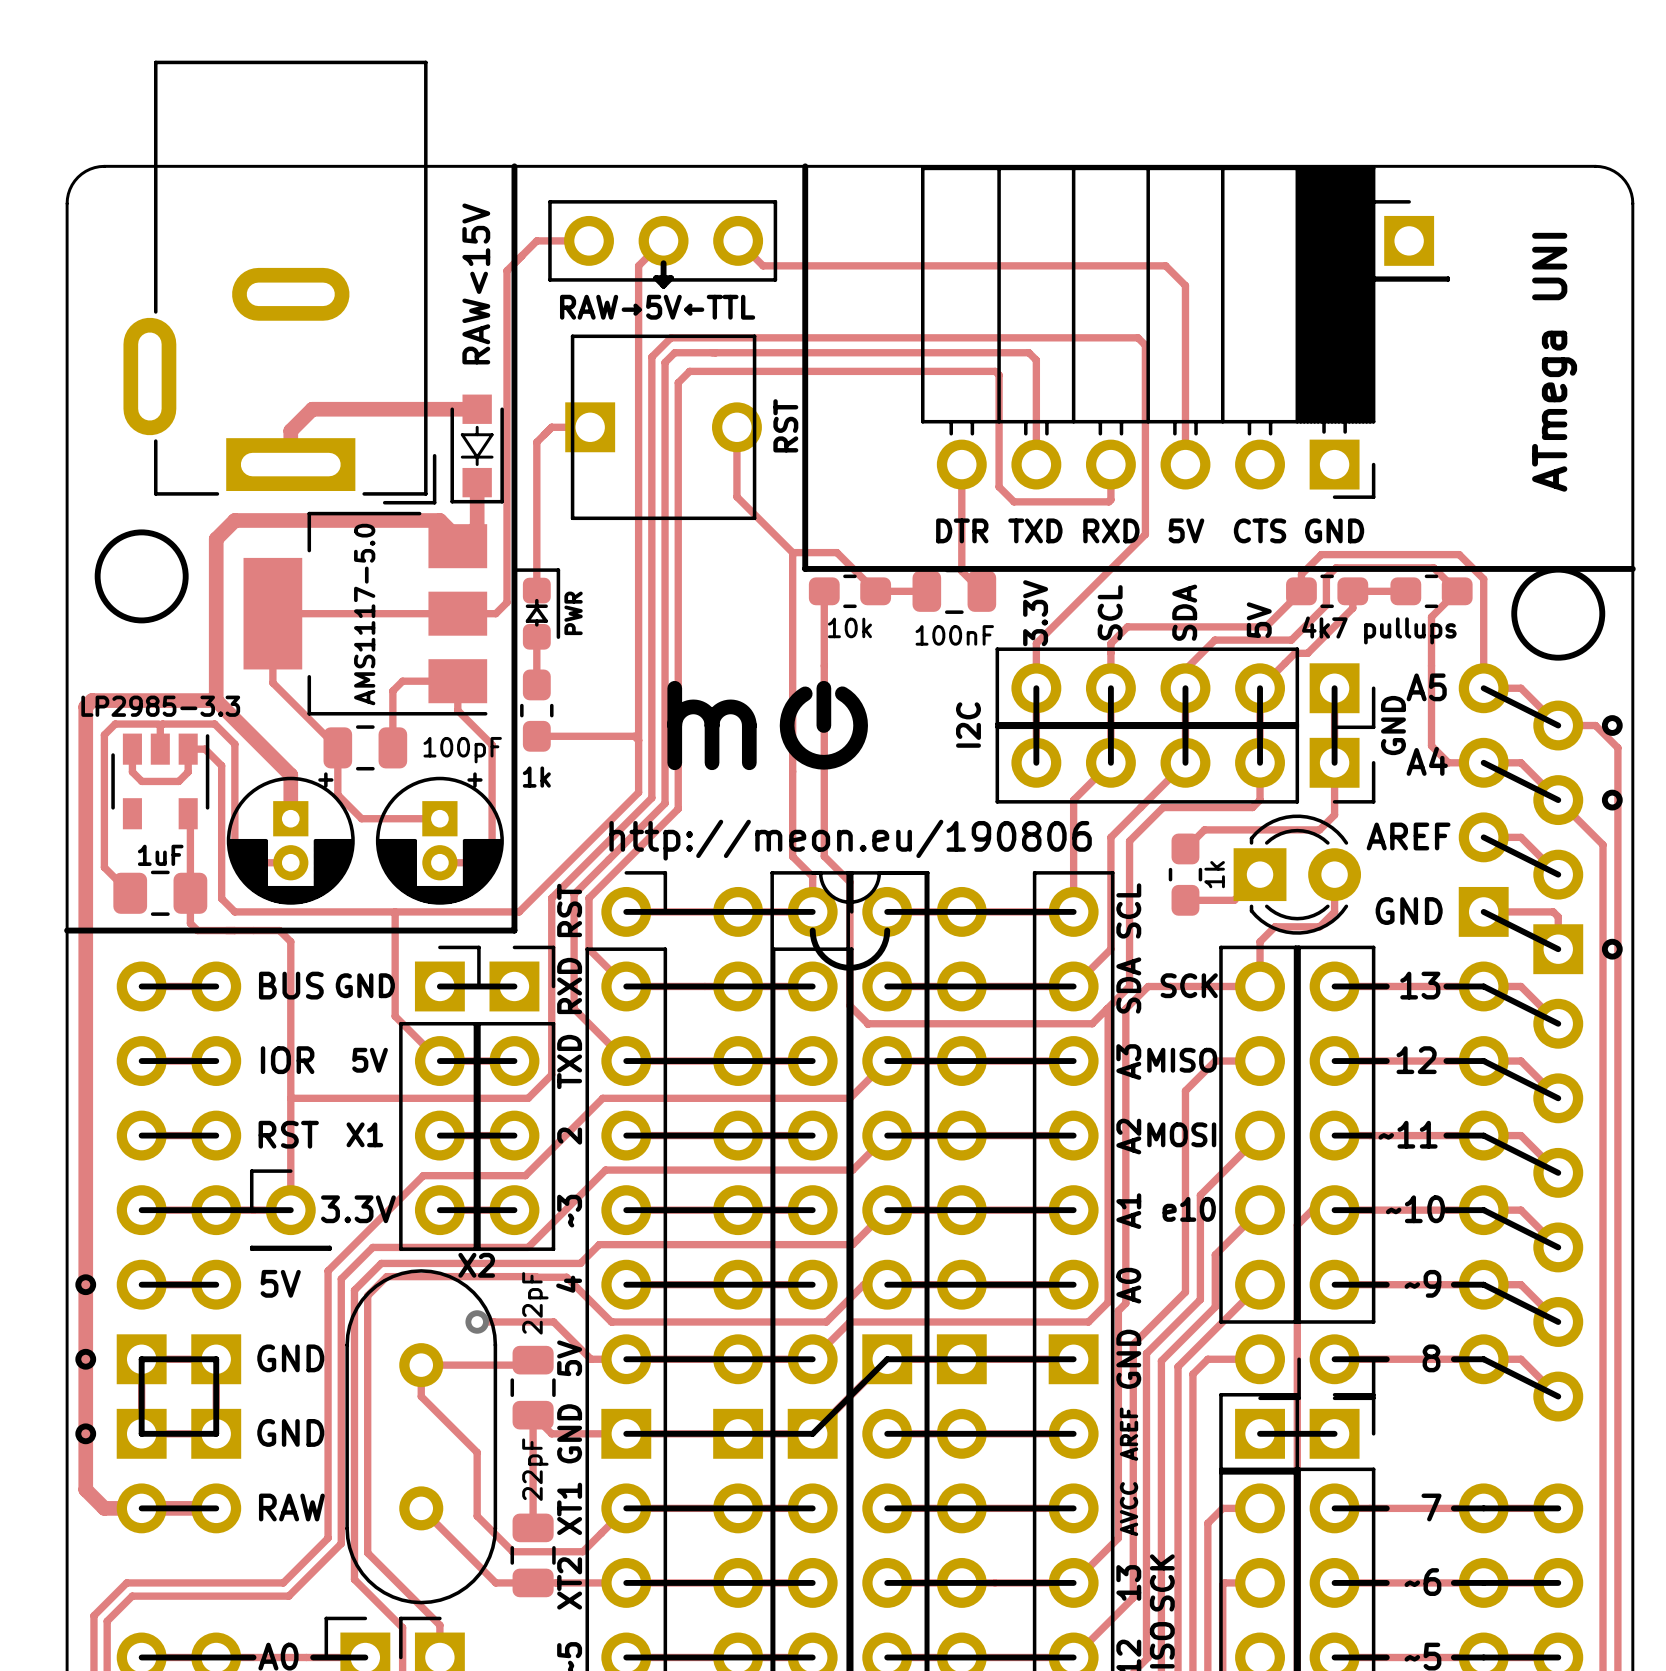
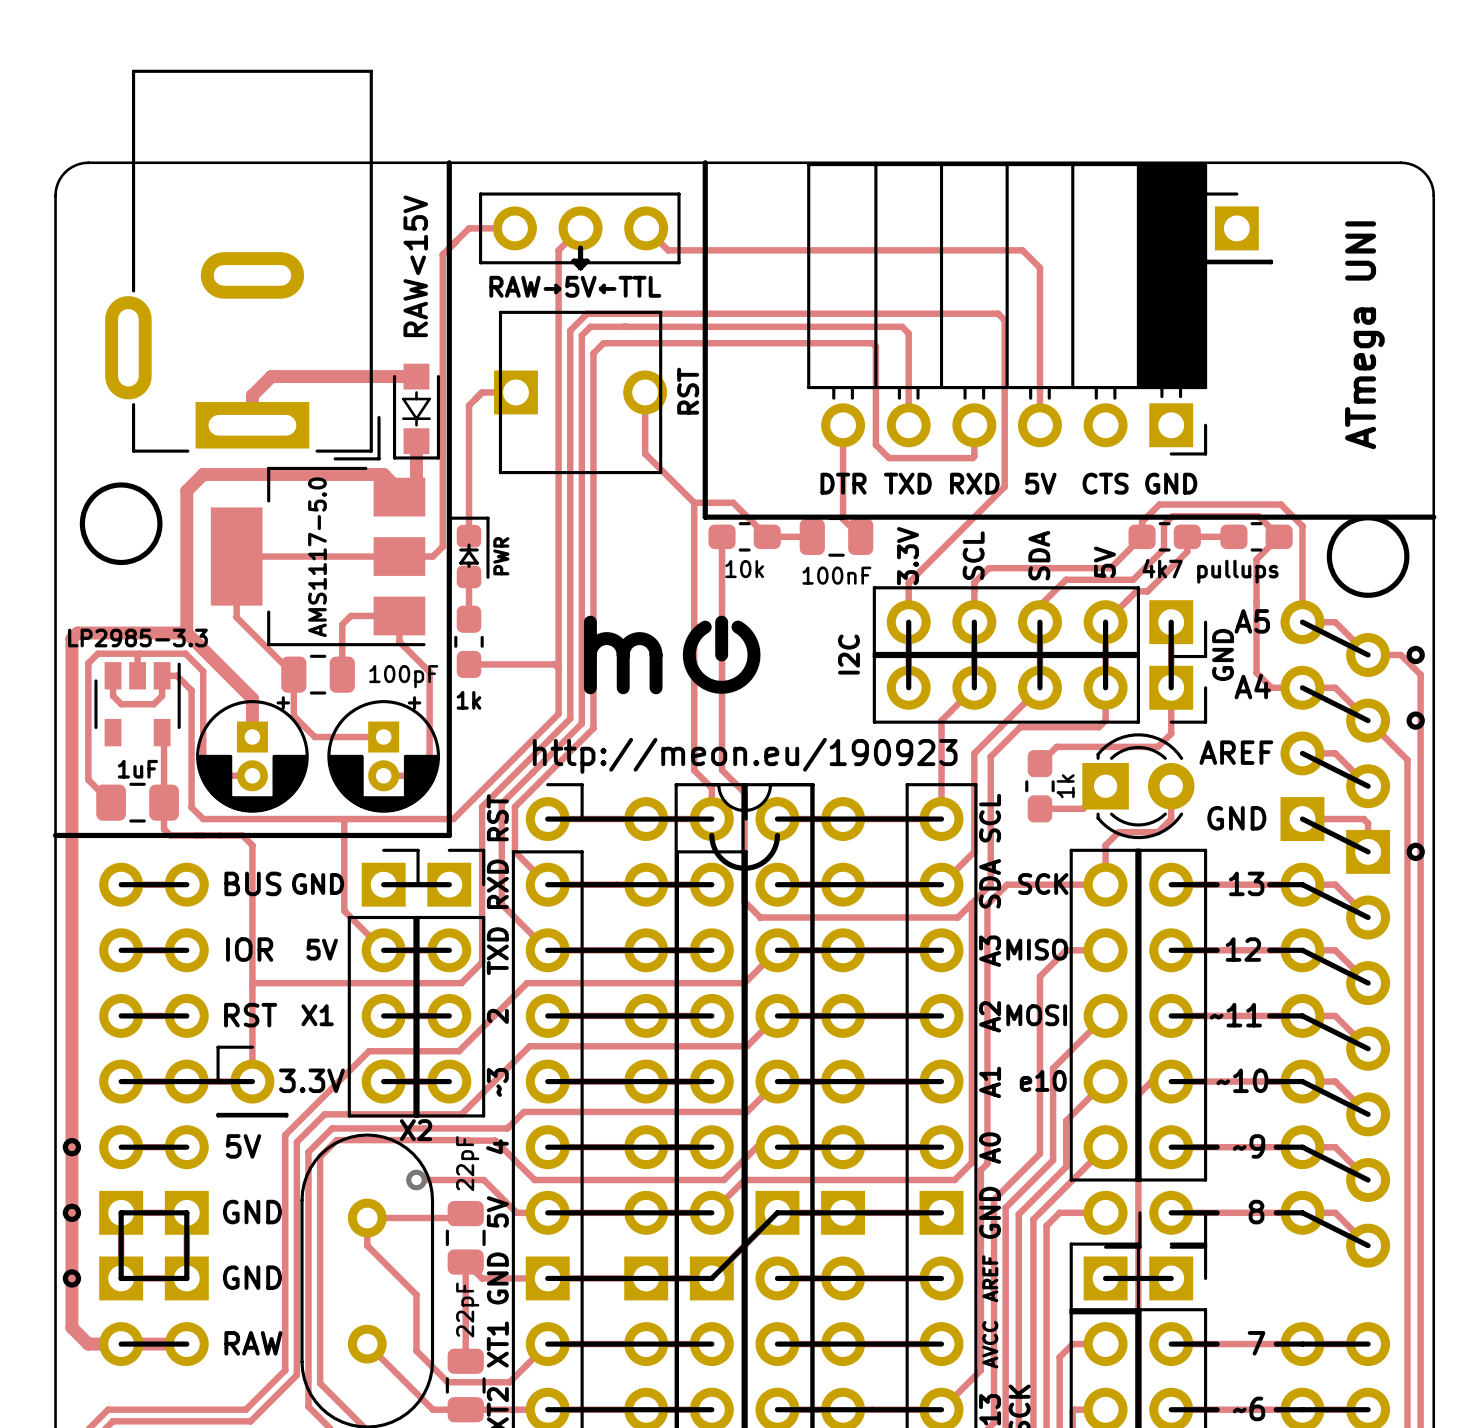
text: http://meon.eu/190806 (850, 840) -> http://meon.eu/190923 (745, 755)

